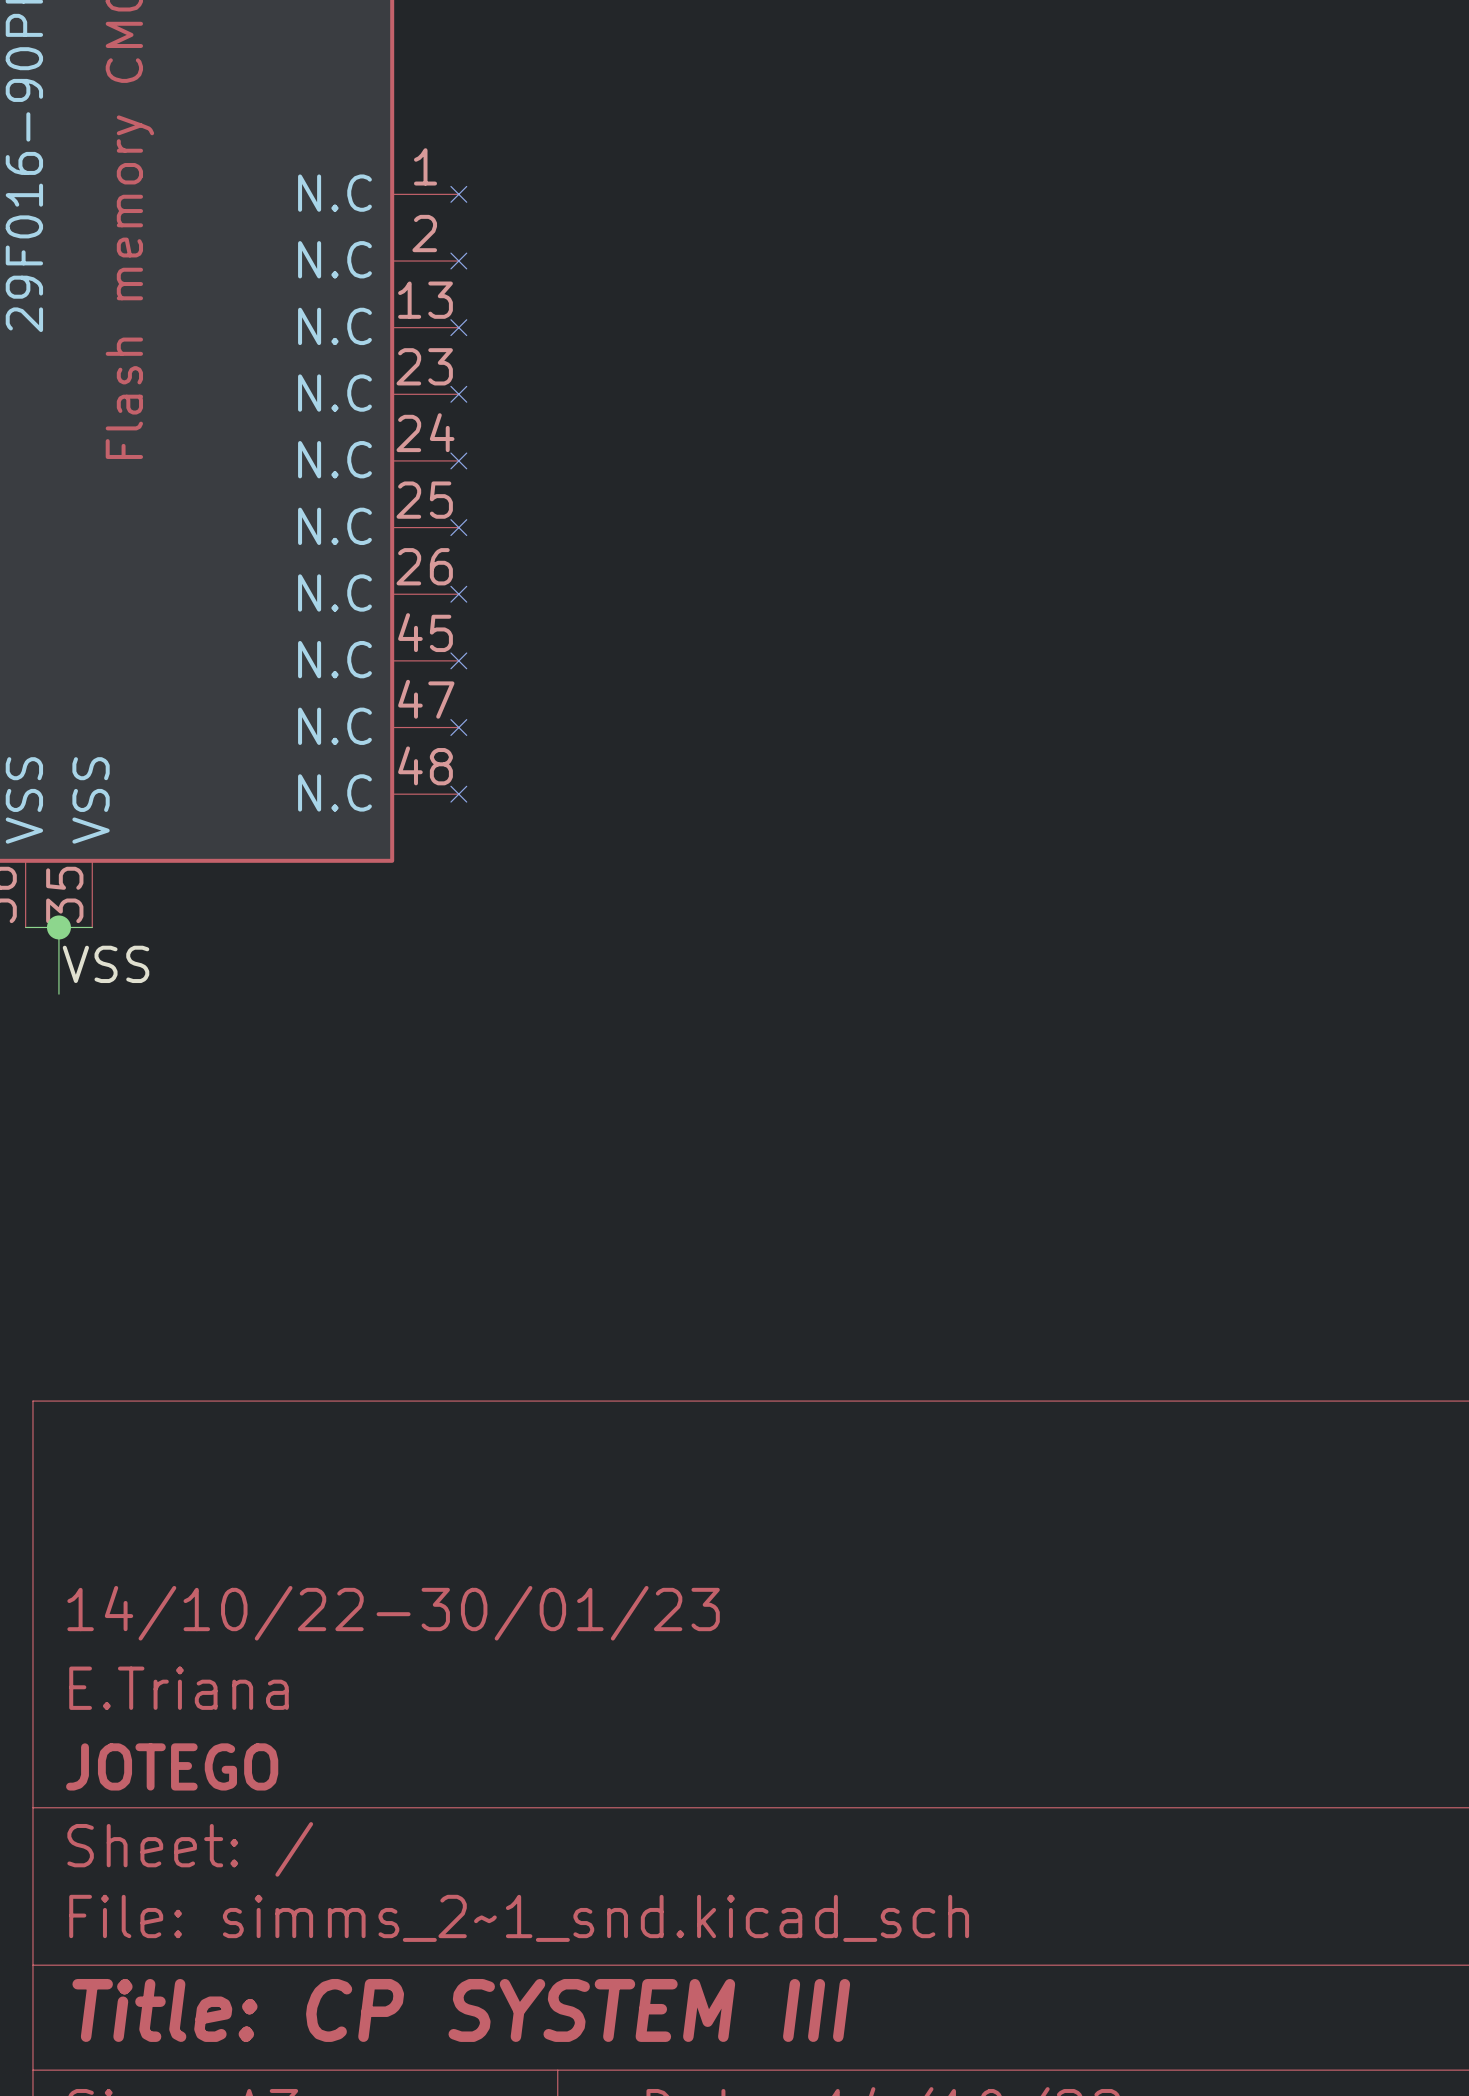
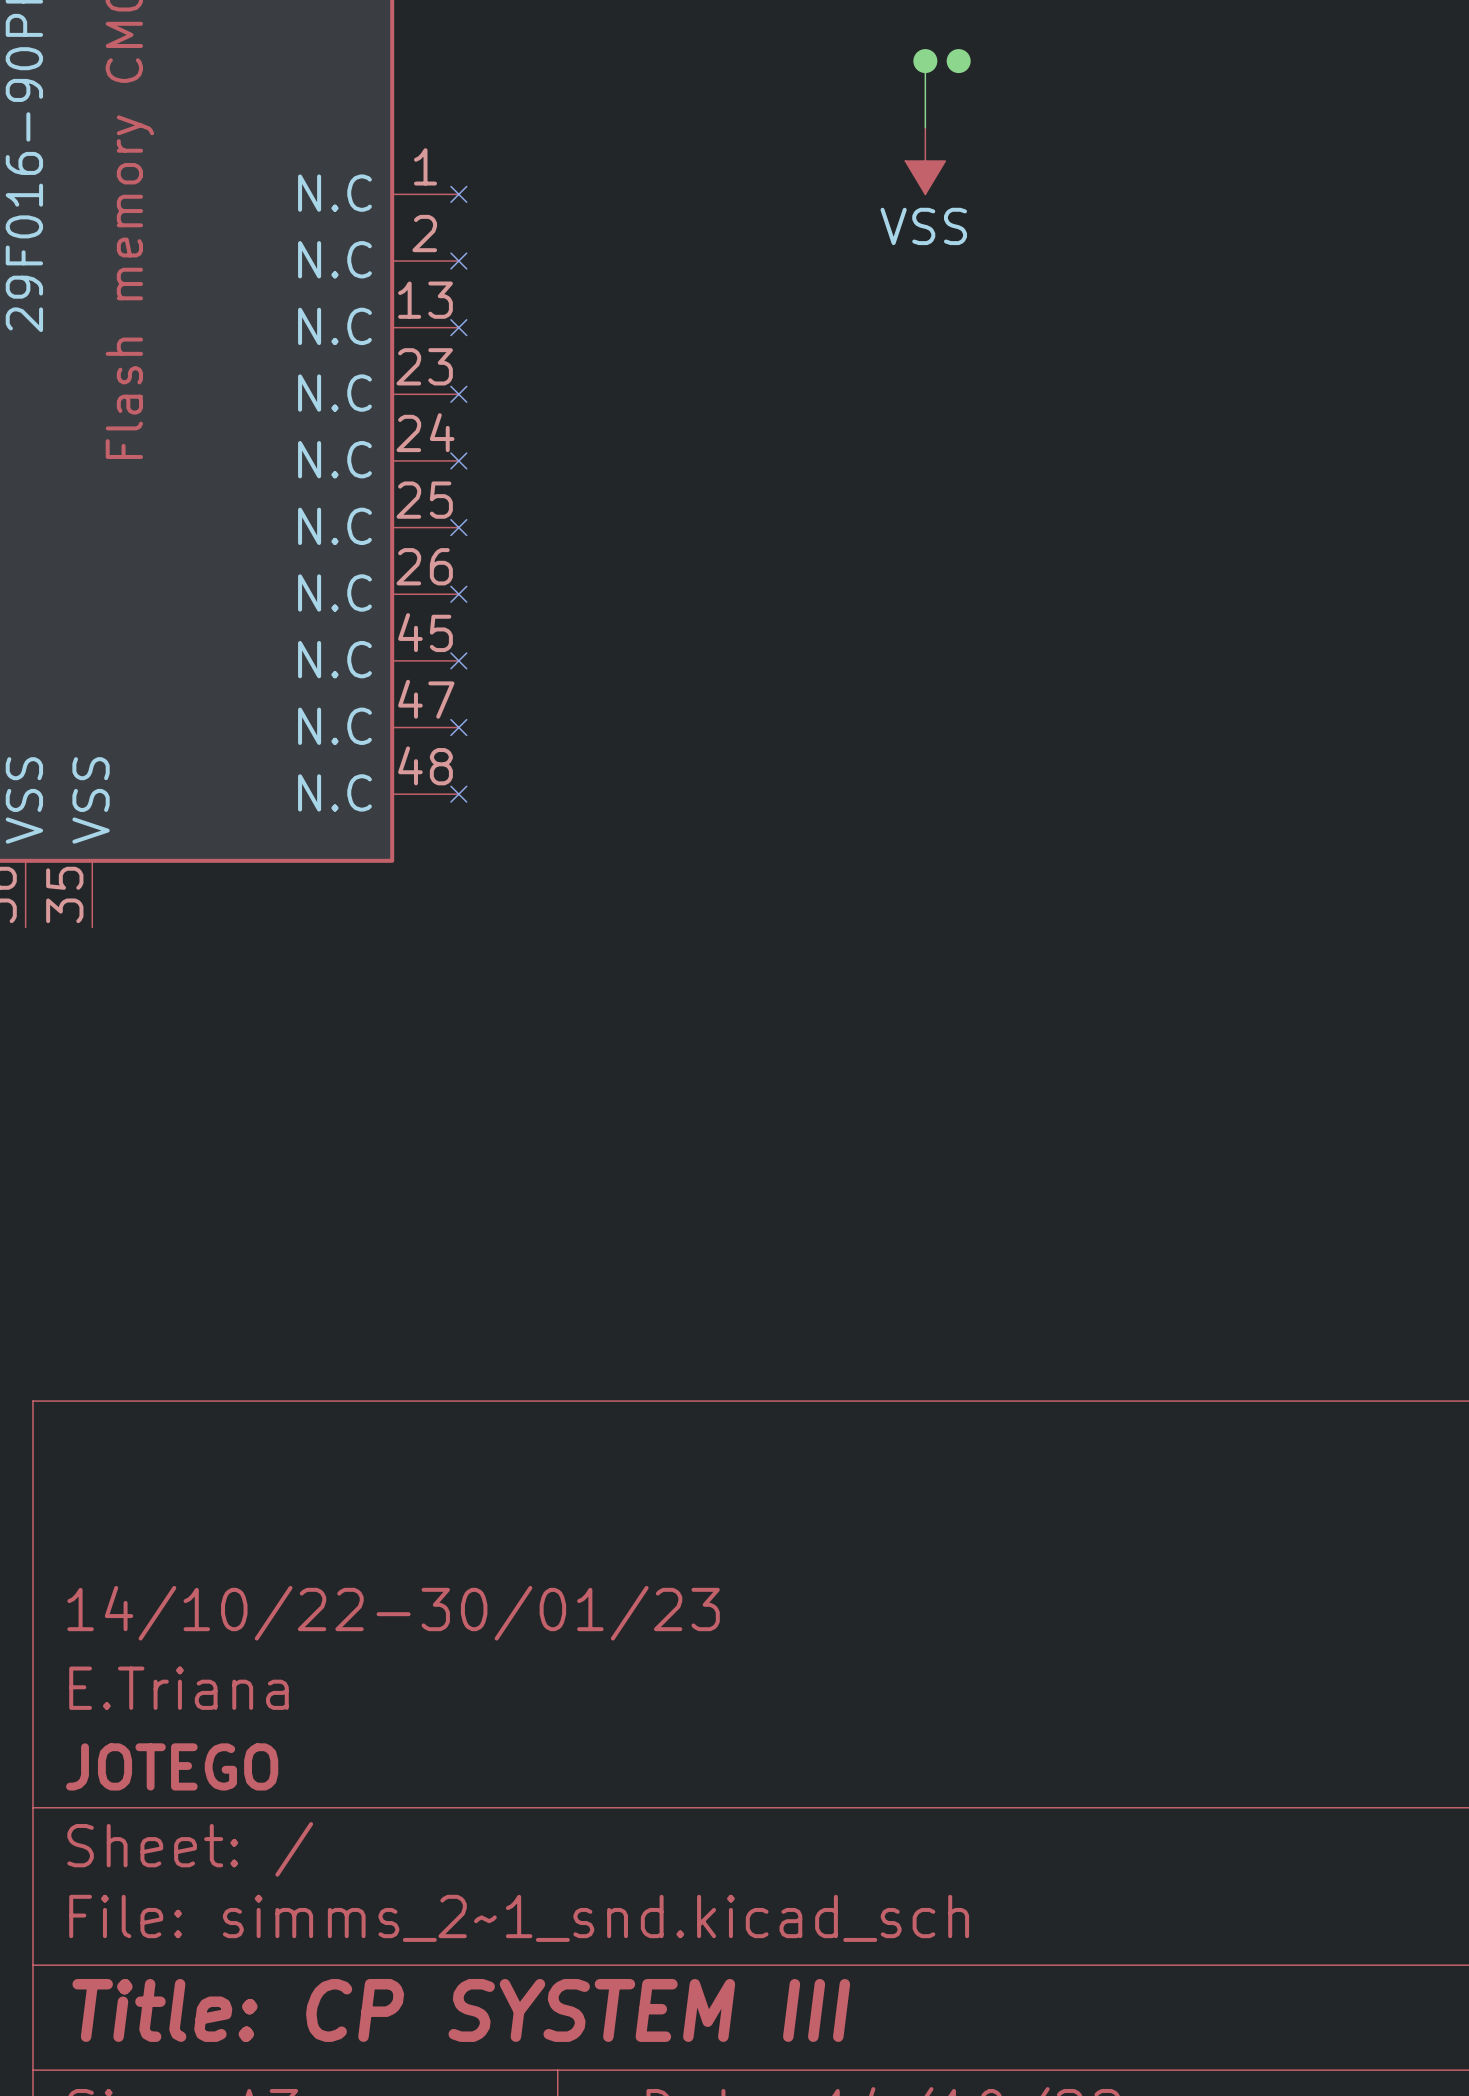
wire: none -> (925, 61) (925, 127)
junction: none -> (925, 61)
junction: none -> (958, 61)
power symbol: none -> VSS (925, 161)
wire: (25, 927) (92, 927) -> none
wire: (58, 927) (58, 994) -> none
junction: (58, 927) -> none
label: VSS (106, 964) -> none

